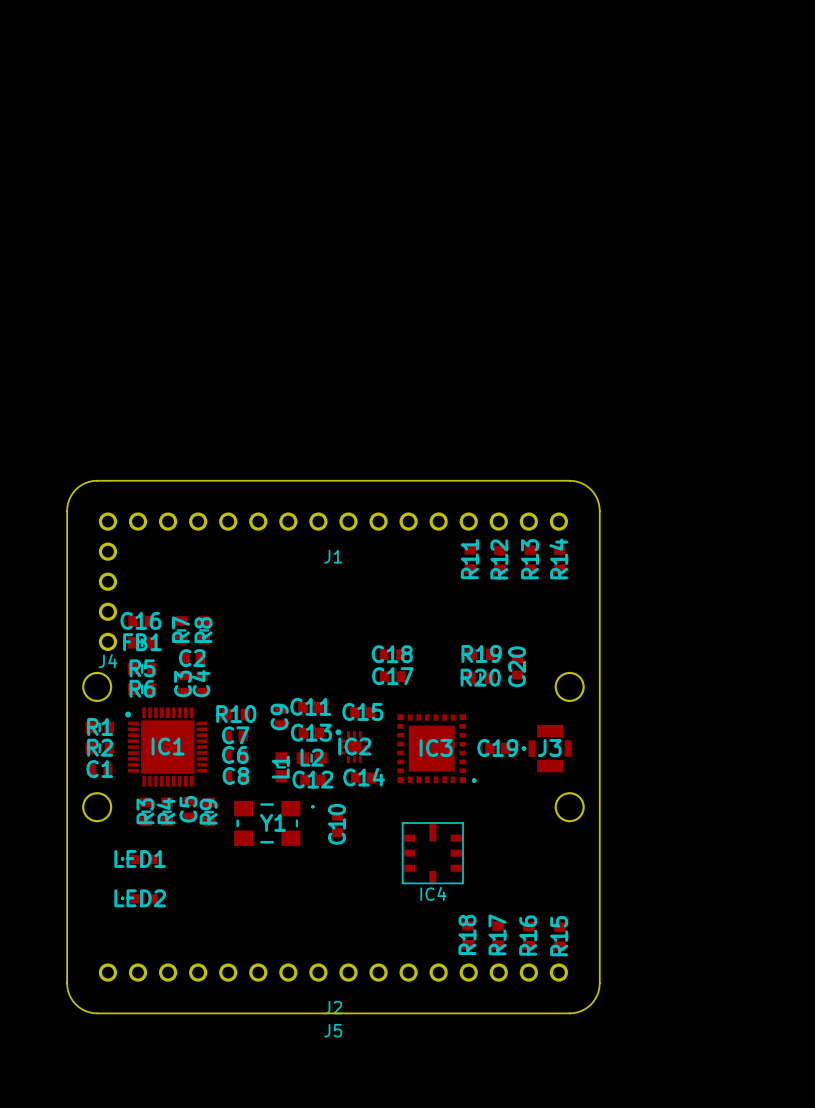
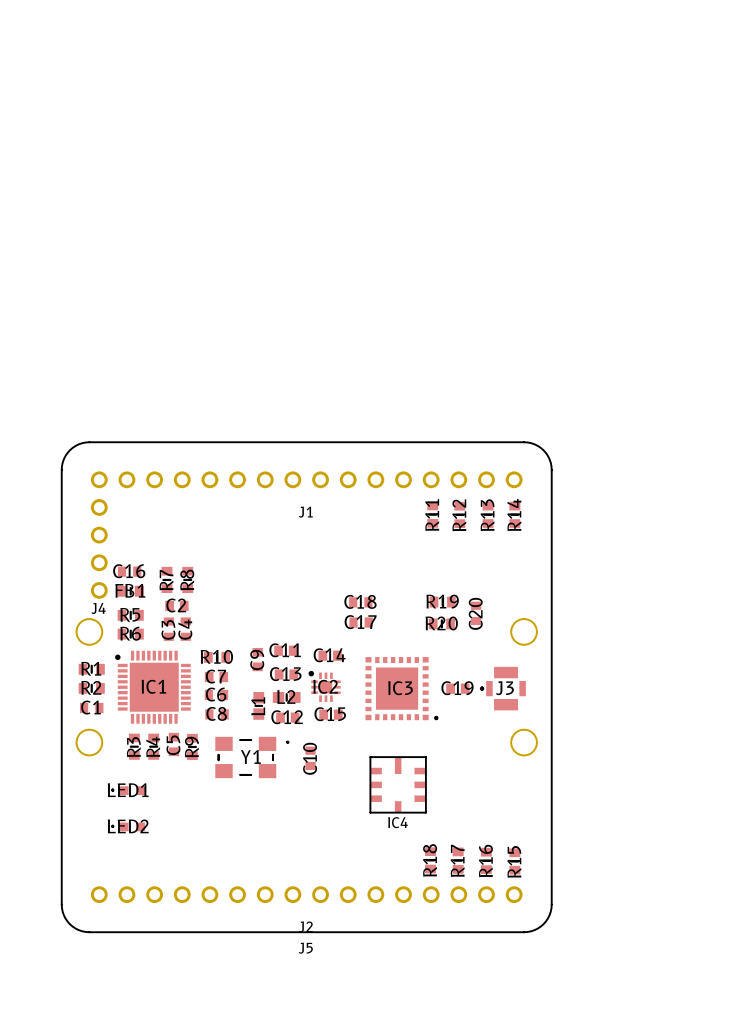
C15 position: (362, 712) -> (330, 714)
C14 position: (363, 778) -> (330, 655)

